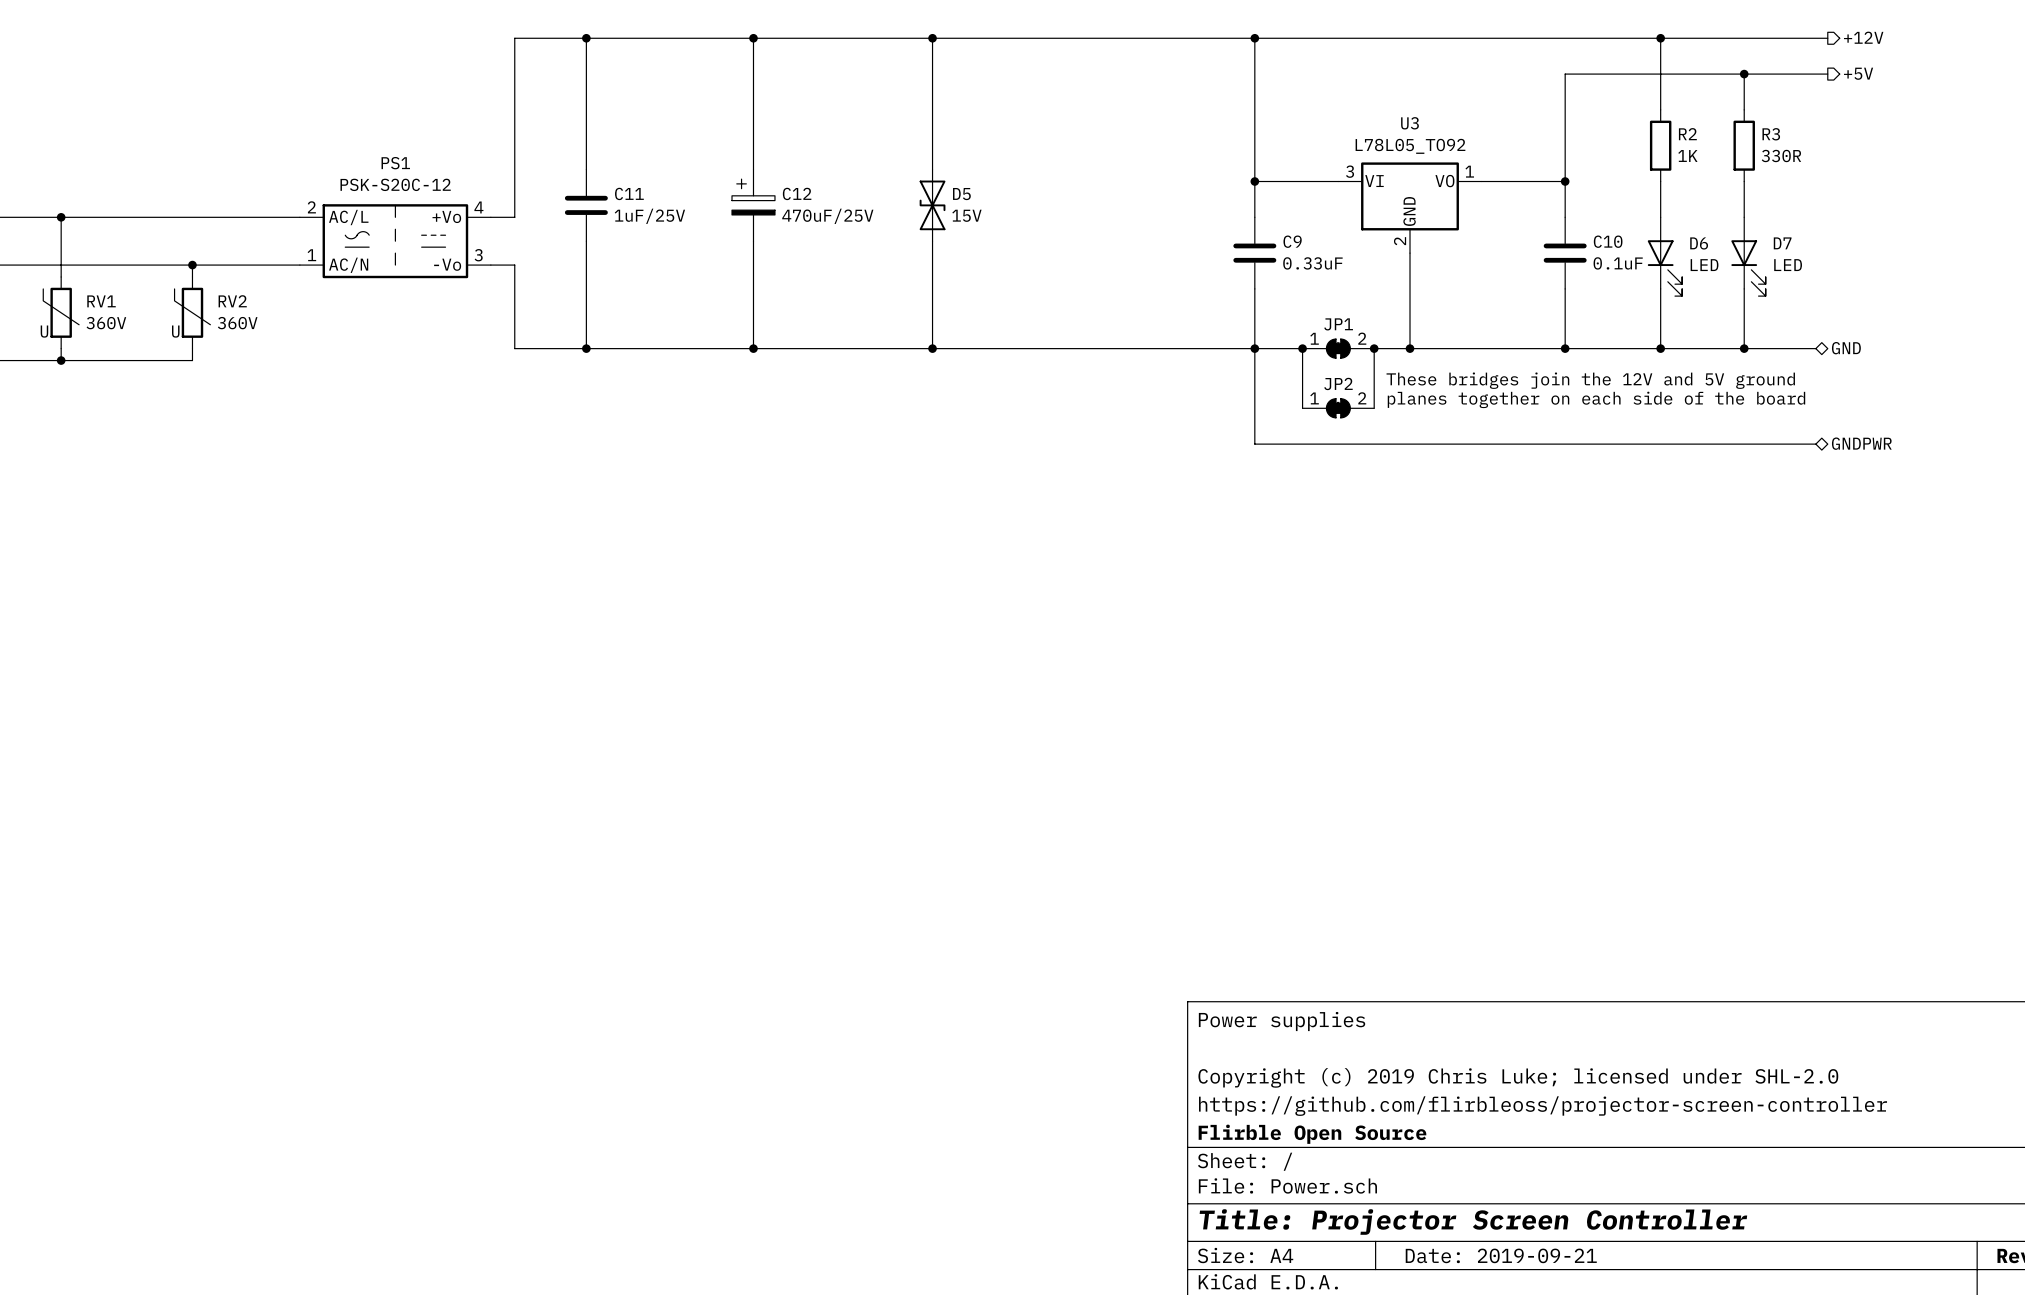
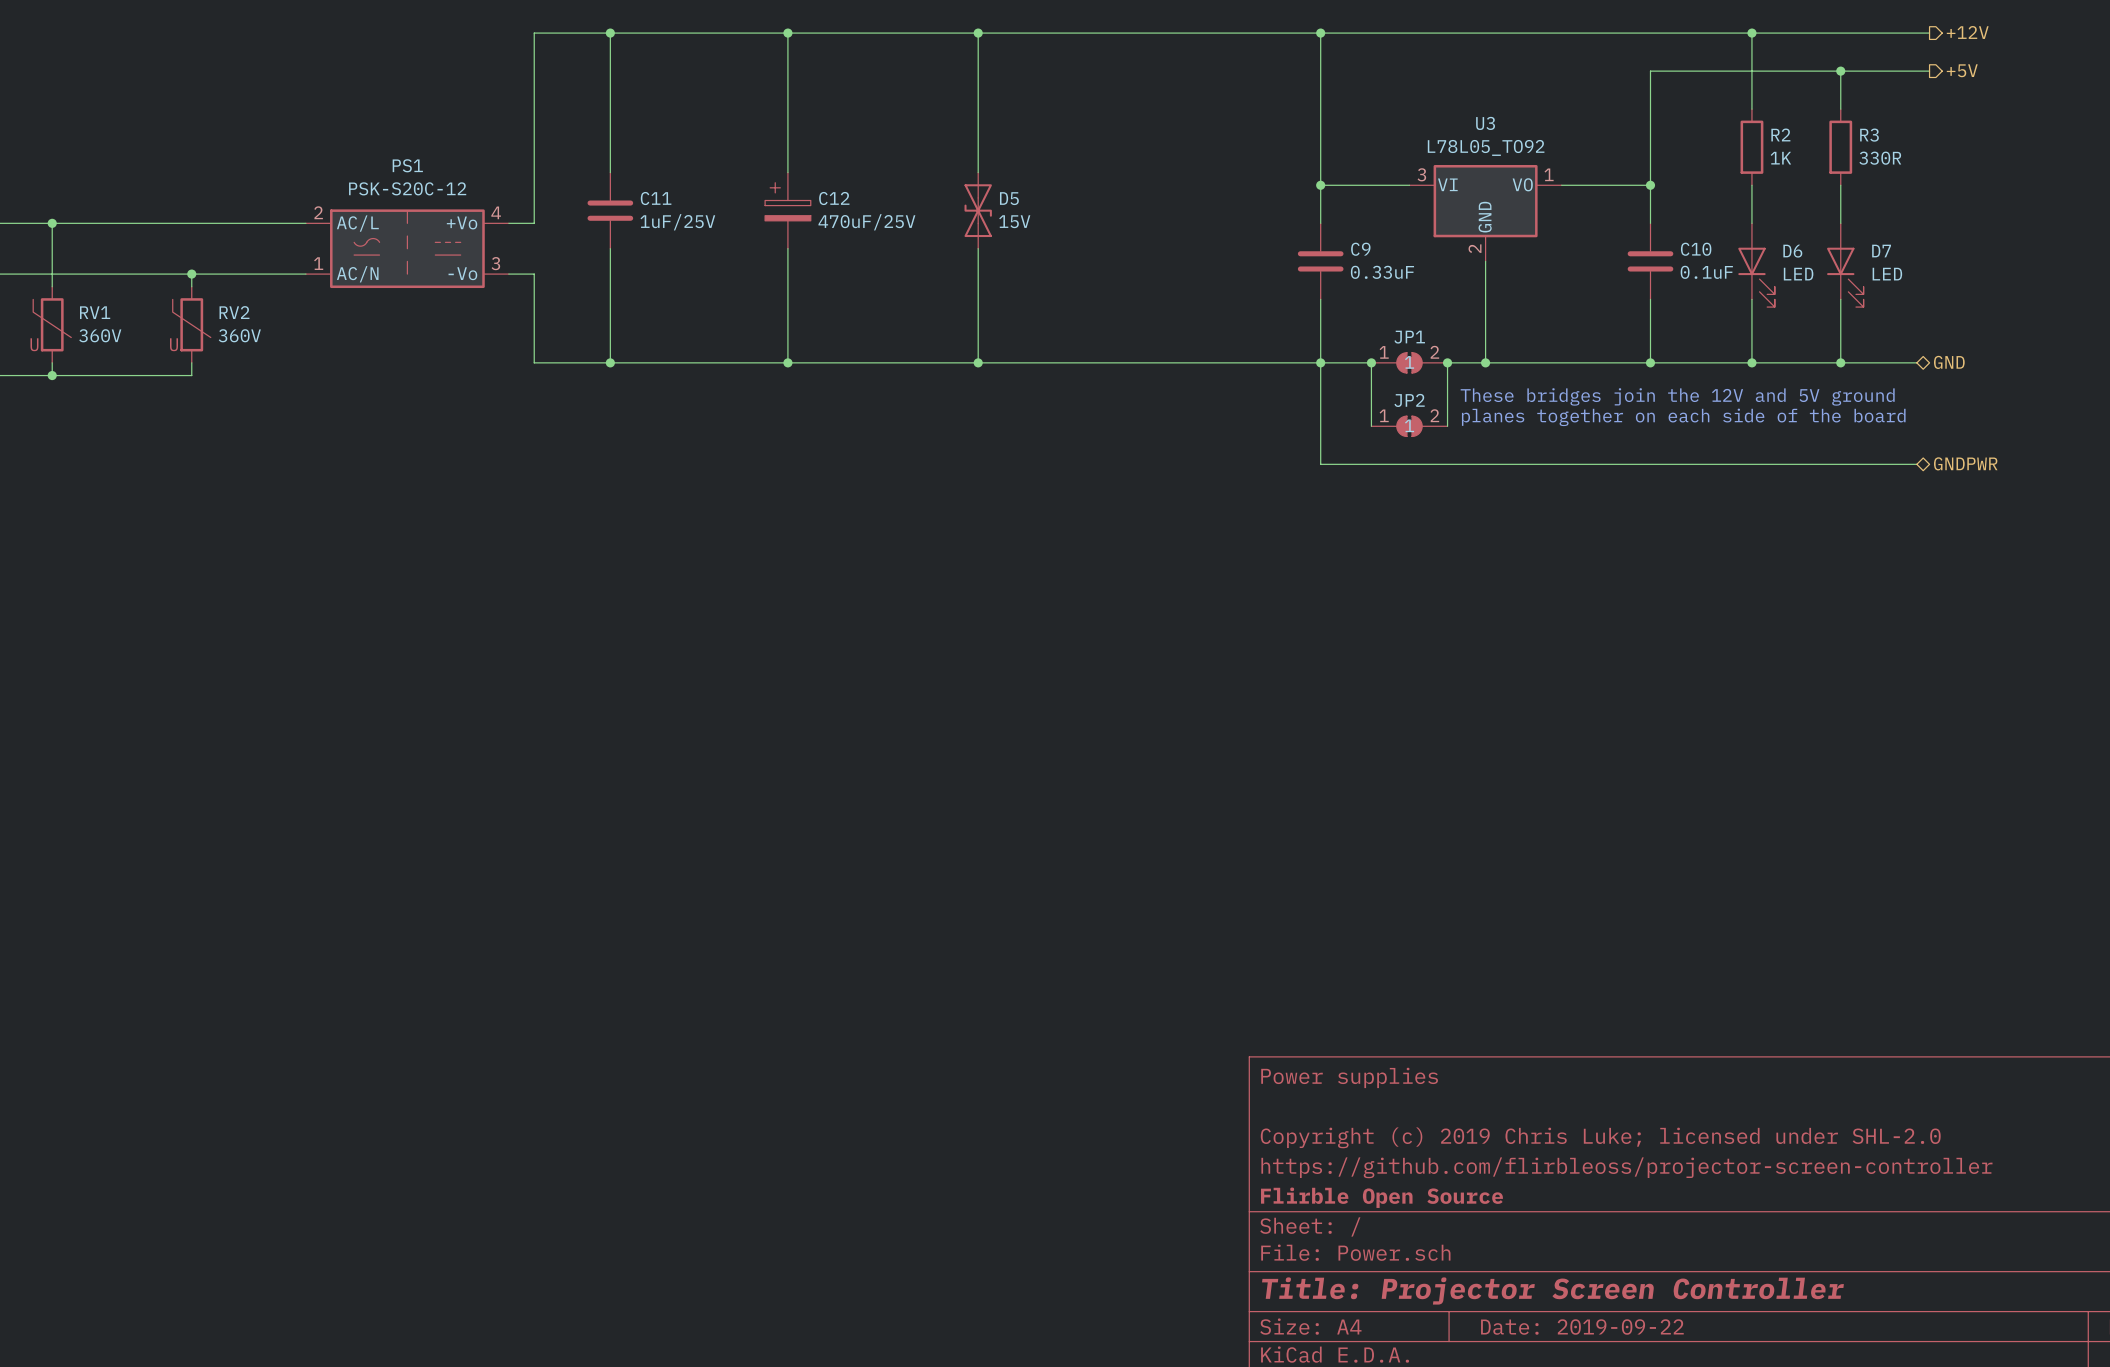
title block: Date: 2019-09-21 (1501, 1255) -> Date: 2019-09-22 (1582, 1327)

